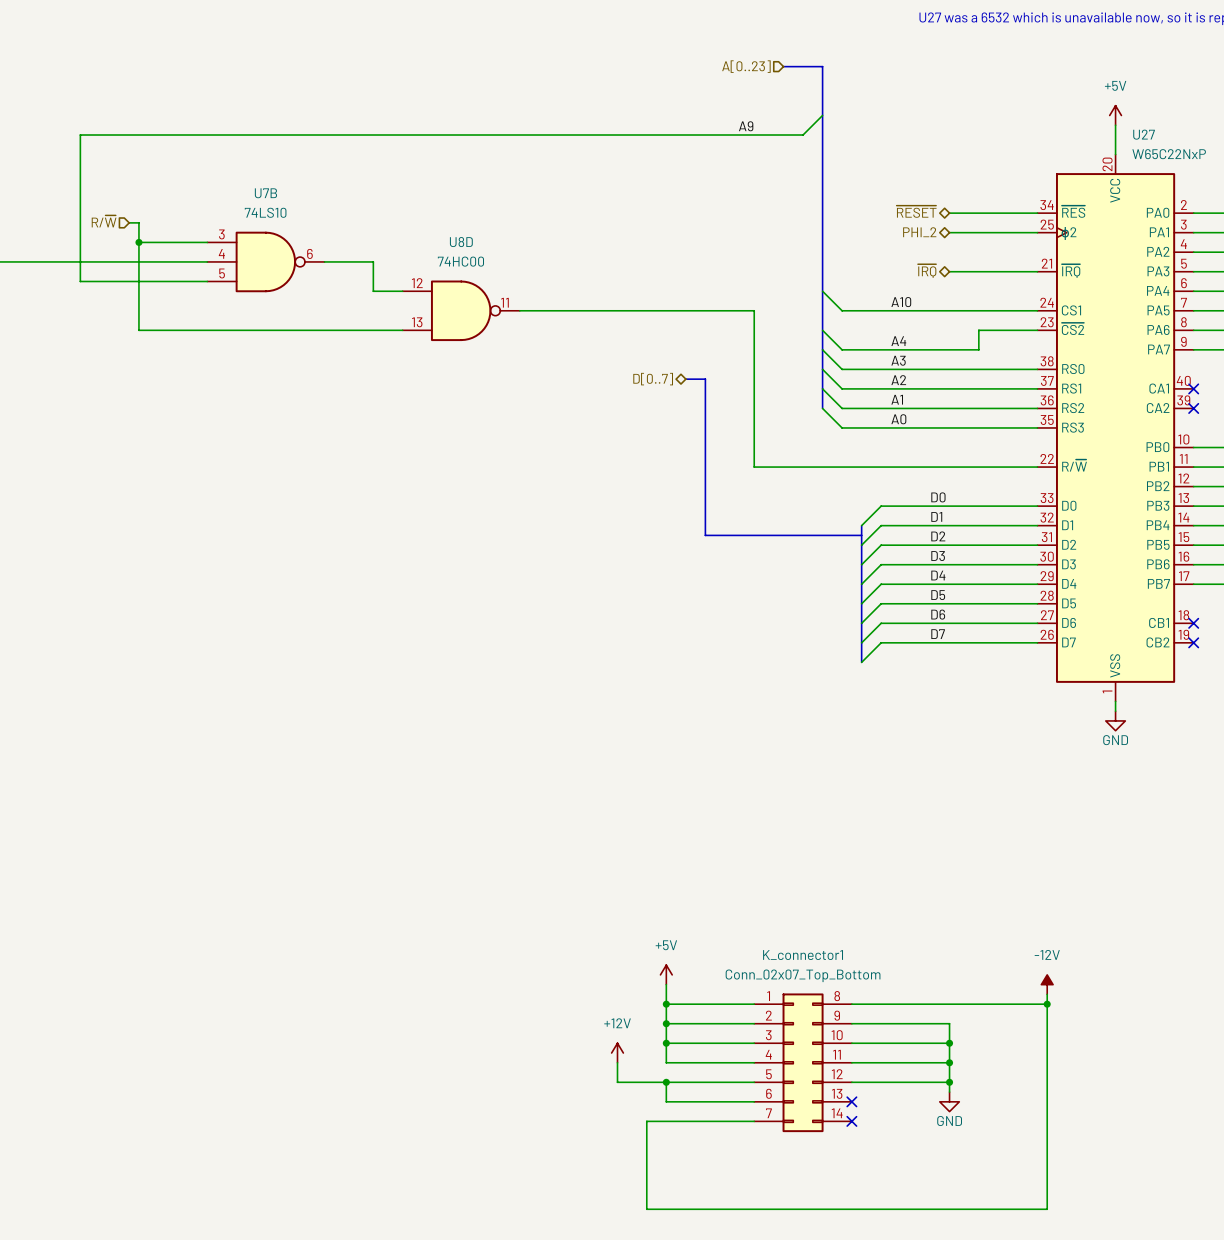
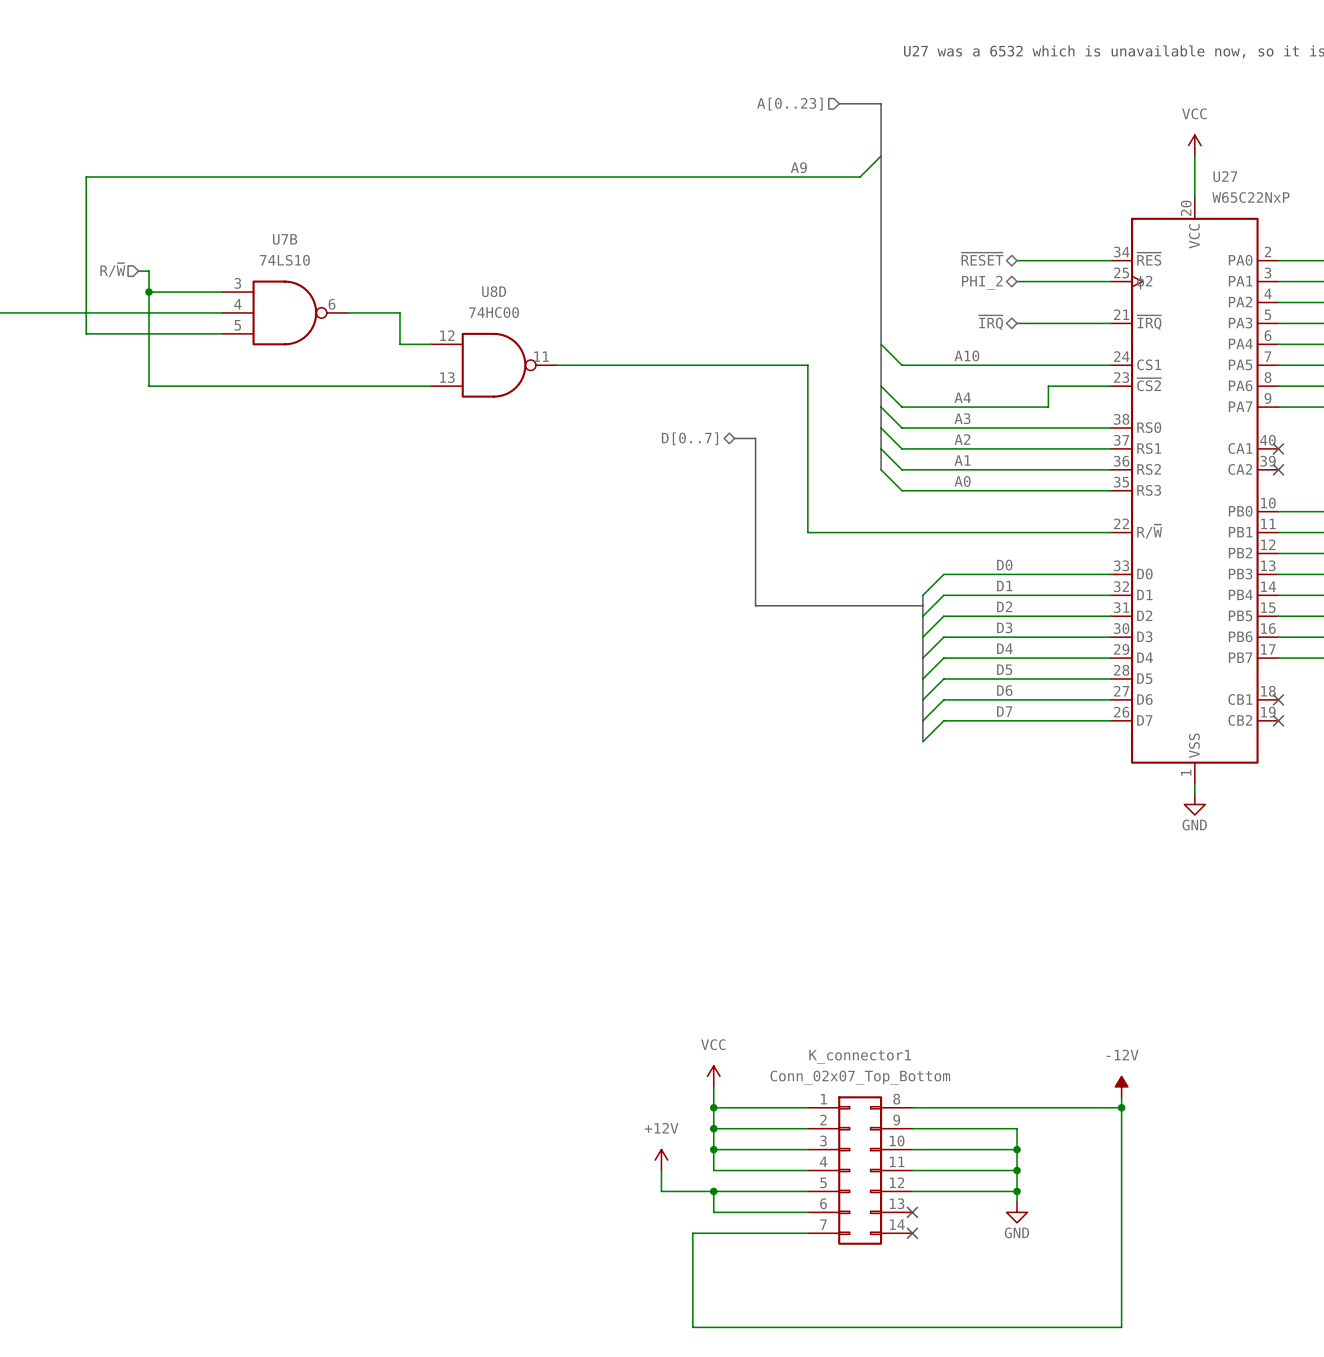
power symbol: none -> VCC (1194, 145)
power symbol: +5V (1115, 115) -> none
power symbol: +5V (666, 974) -> VCC (713, 1076)

